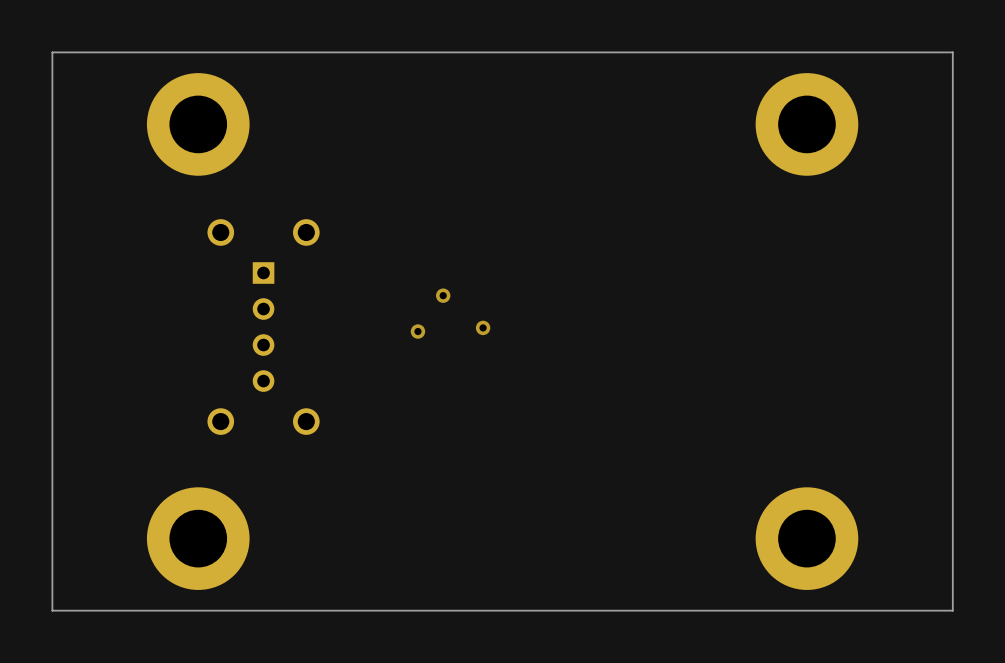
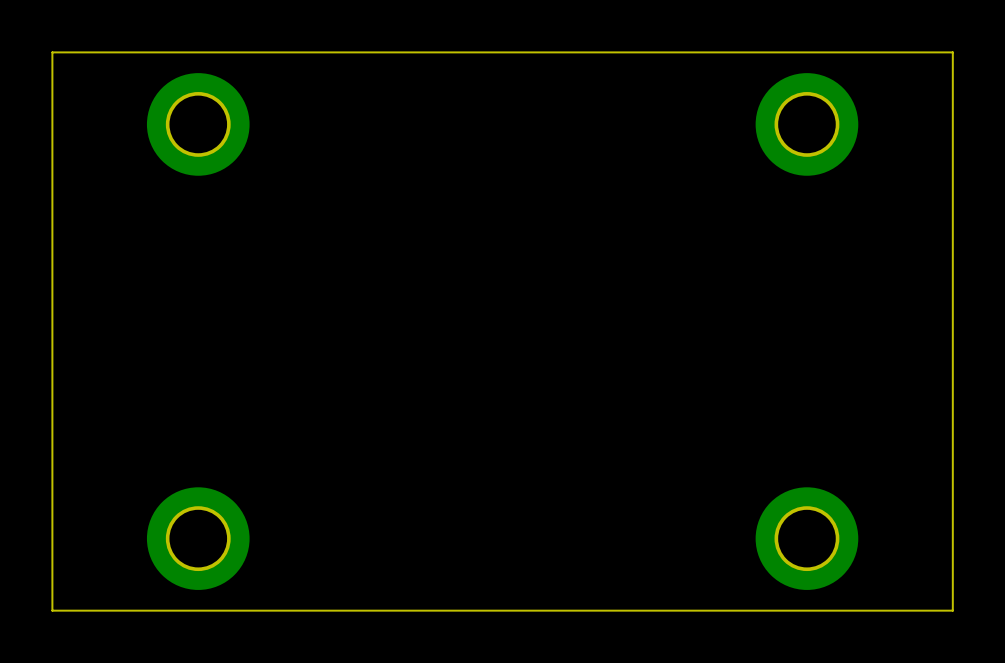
via: (443, 295) -> none
part: (263, 327) -> none
via: (483, 327) -> none
via: (417, 331) -> none

